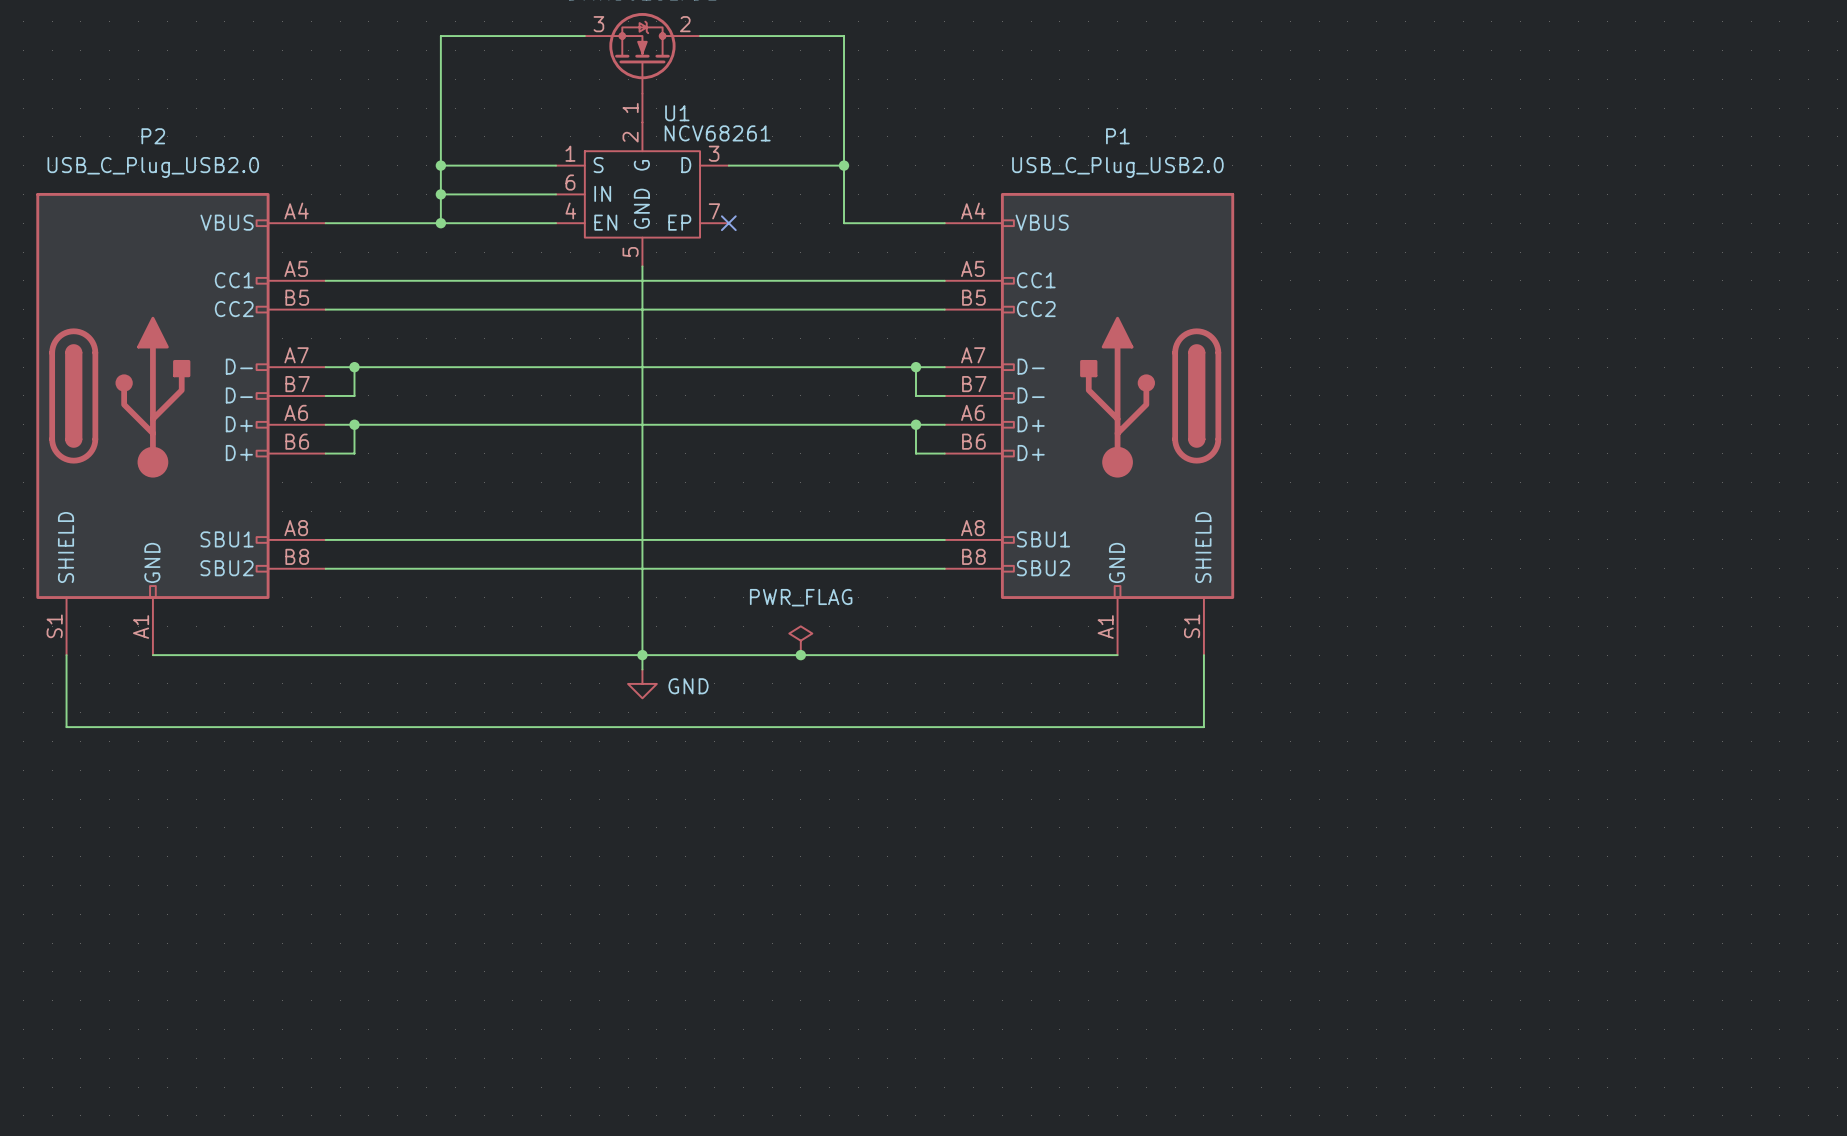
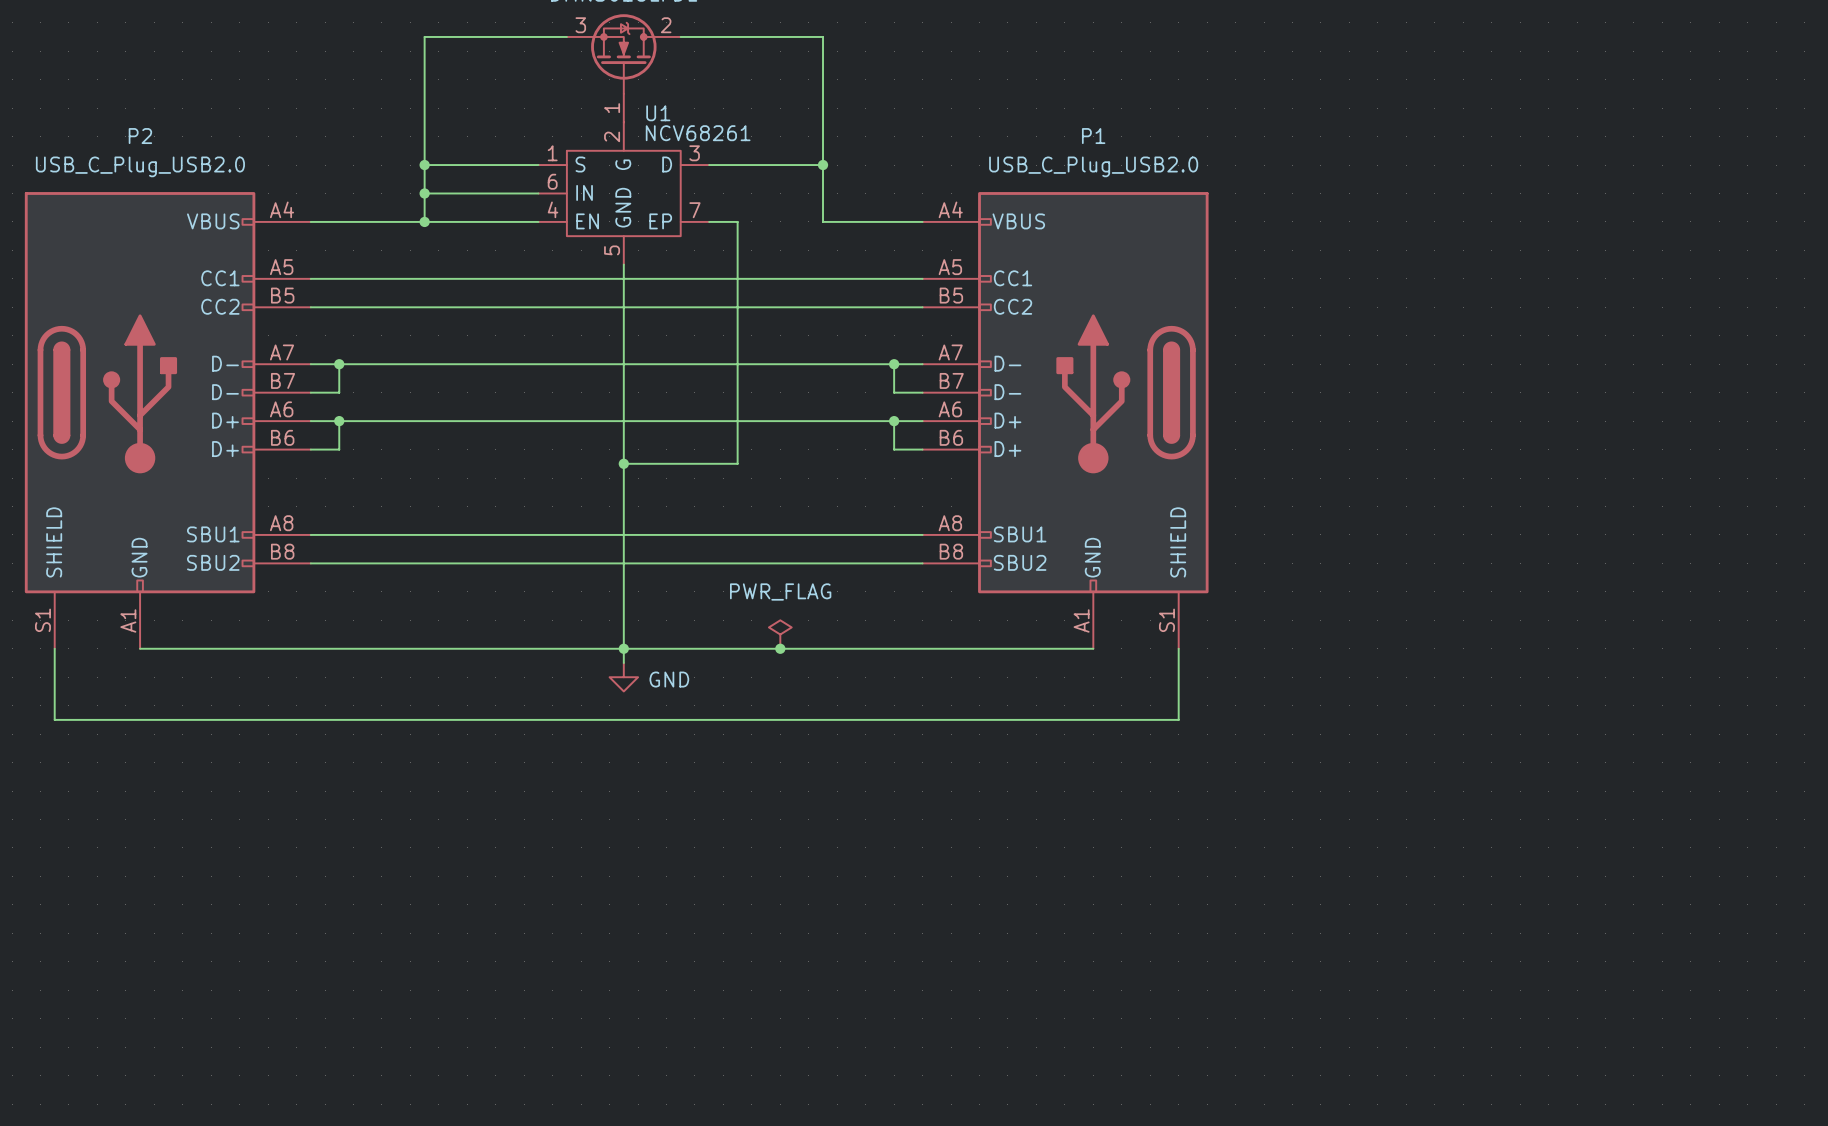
wire: none -> (709, 221) (737, 221) (737, 463) (623, 463)
no-connect mark: (728, 223) -> none
junction: none -> (623, 463)

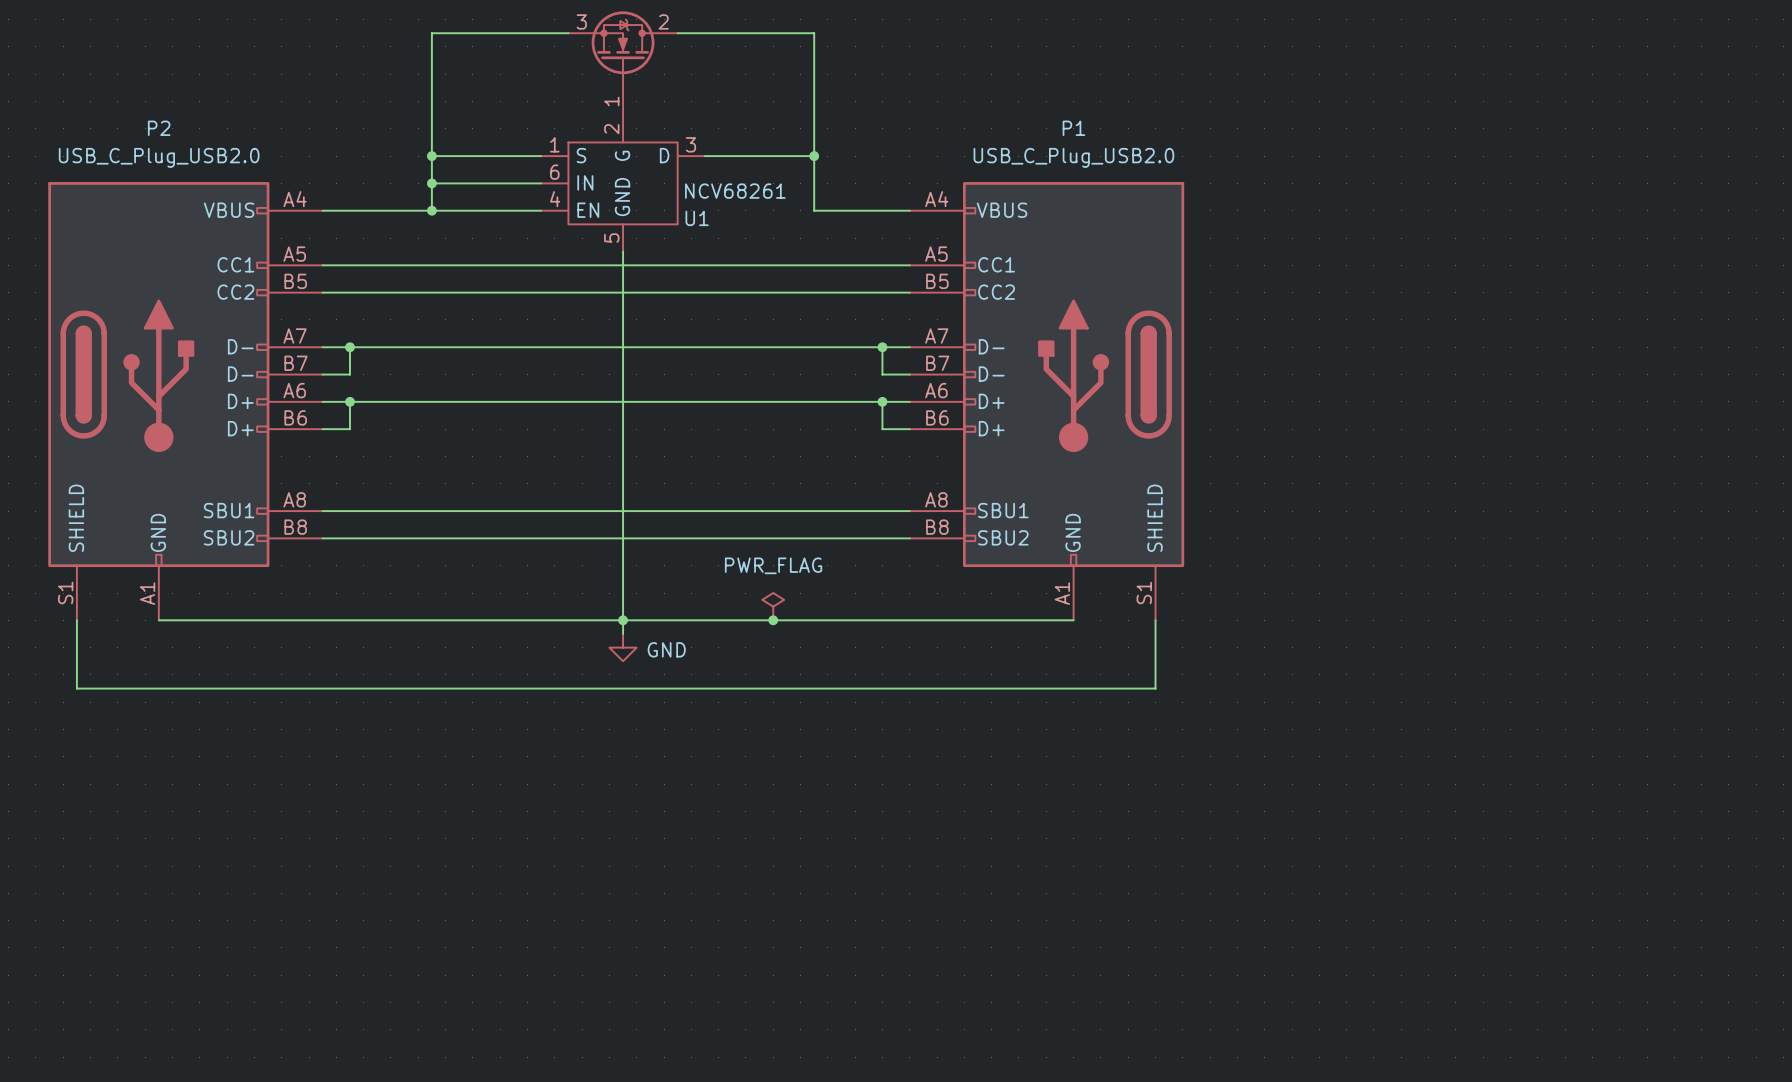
U1 name position: U1 (658, 113) -> U1 (697, 218)
U1 symbol: [538, 122, 710, 265] -> [541, 115, 705, 252]
U1 value position: NCV68261 (698, 133) -> NCV68261 (735, 191)
wire: (709, 221) (737, 221) (737, 463) (623, 463) -> none
junction: (623, 463) -> none

